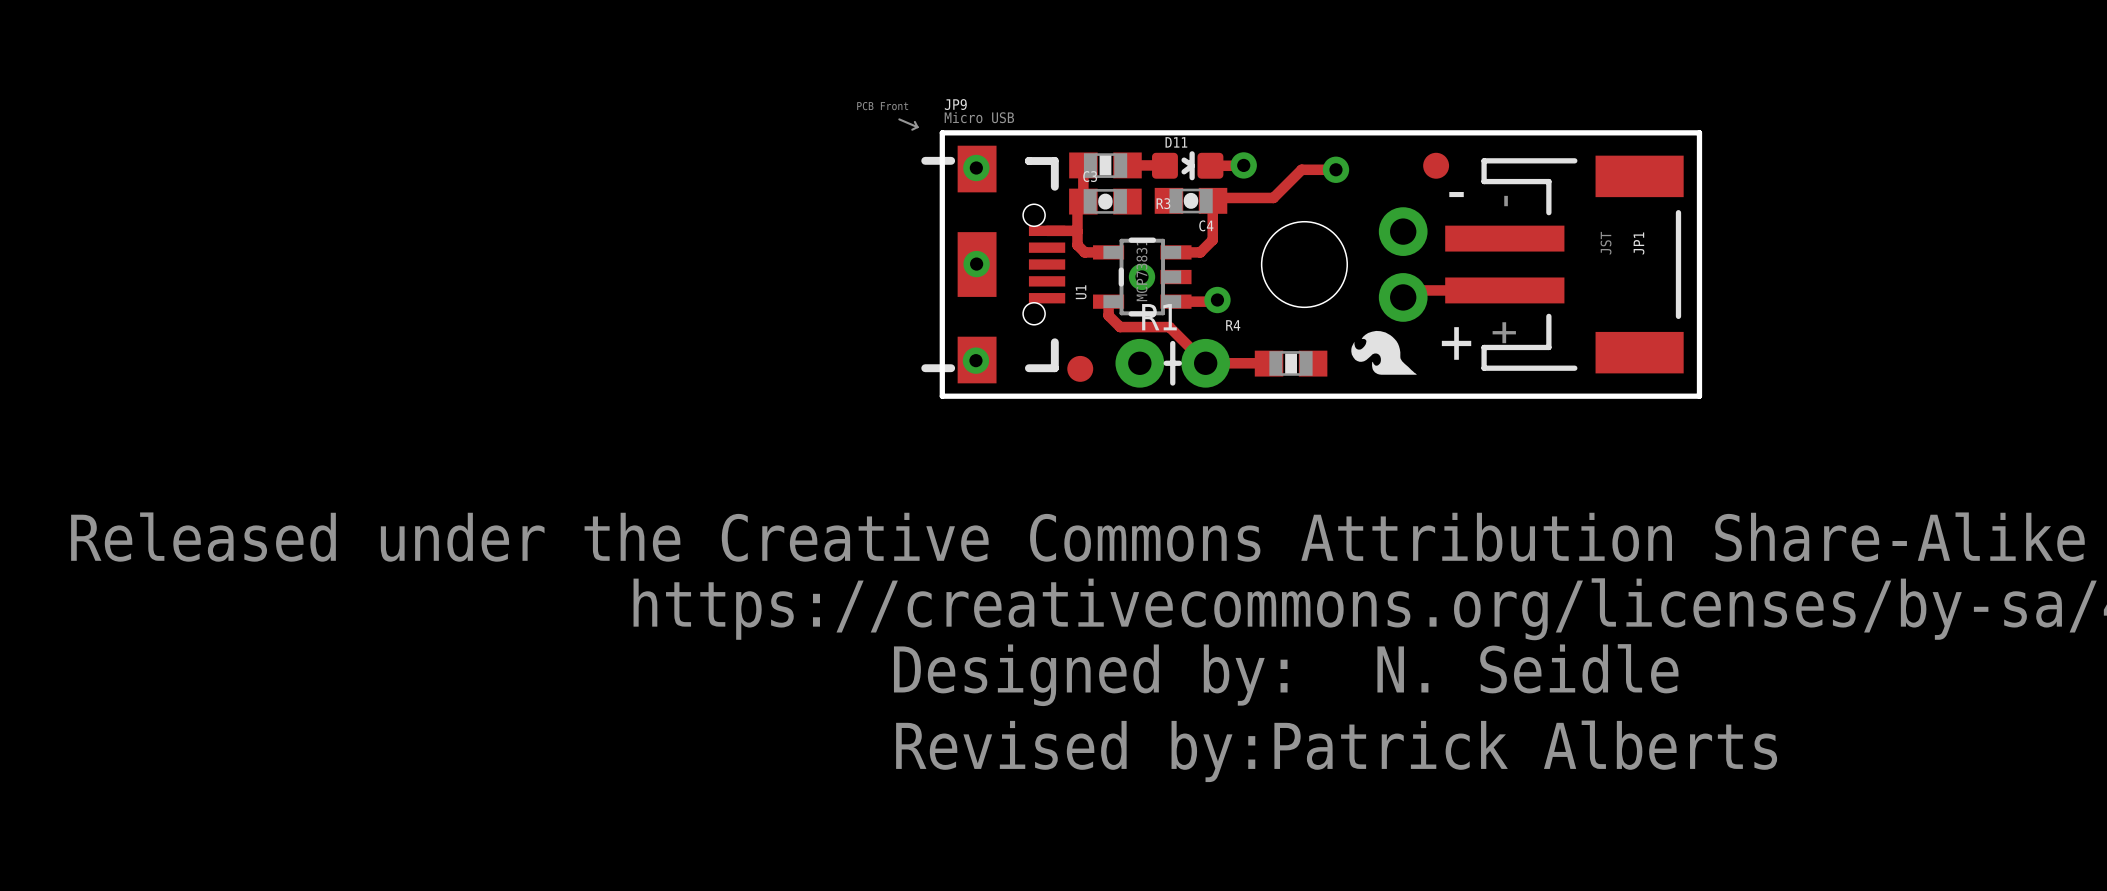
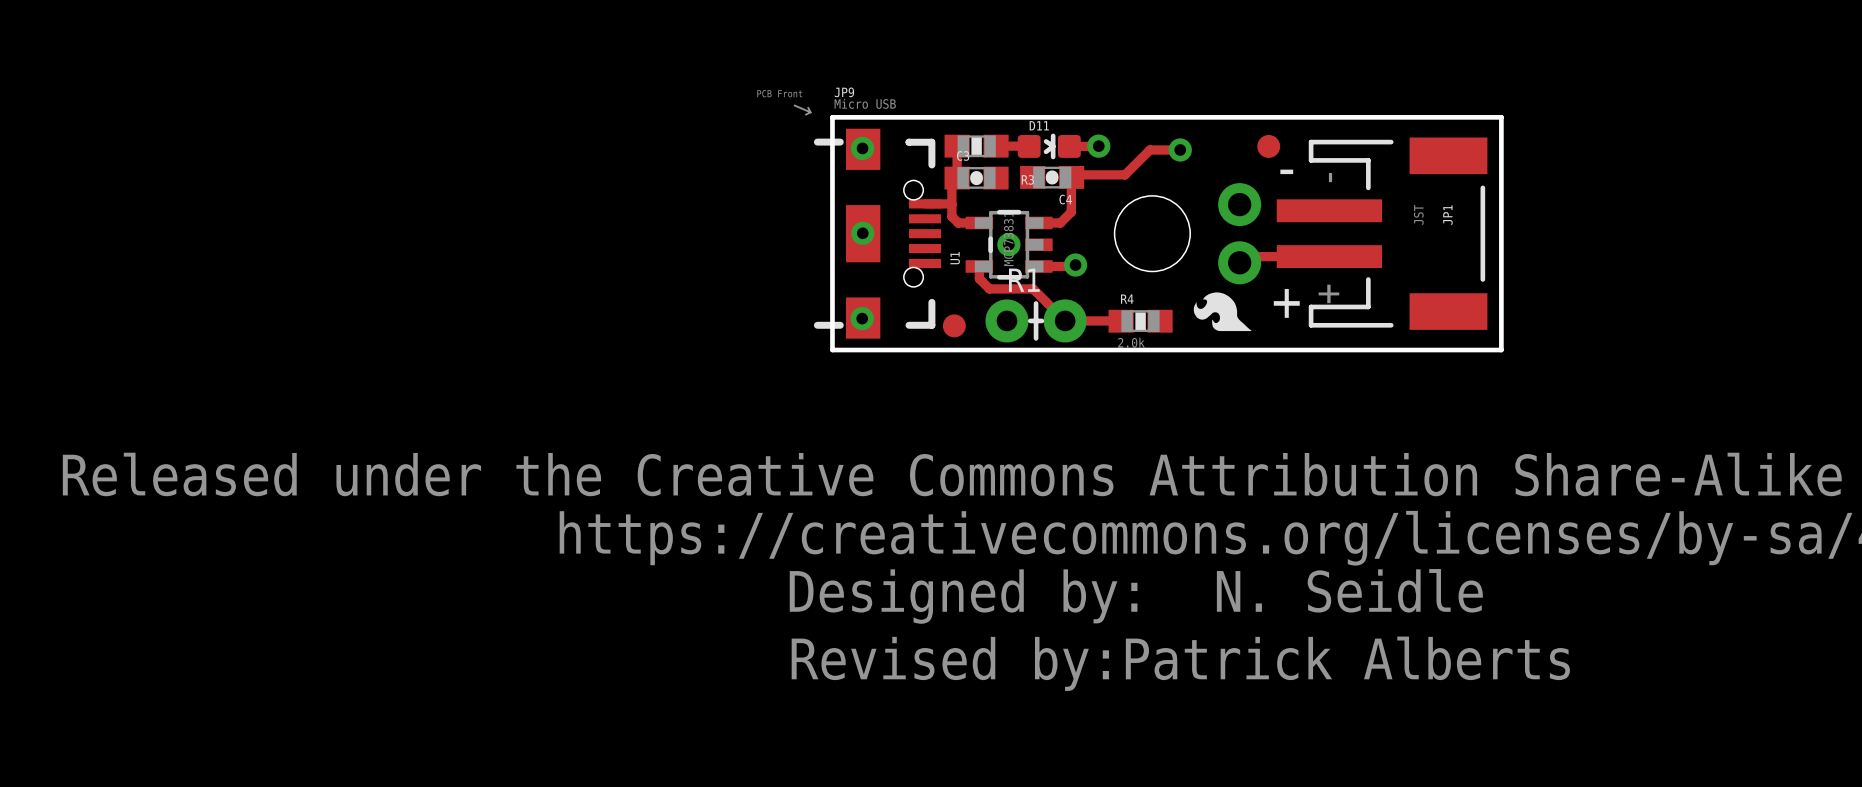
R4 name position: R4 (1233, 325) -> R4 (1127, 299)
R4 value: none -> 2.0k (1131, 342)

